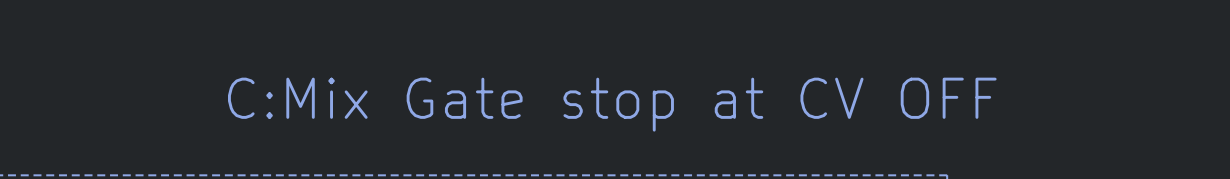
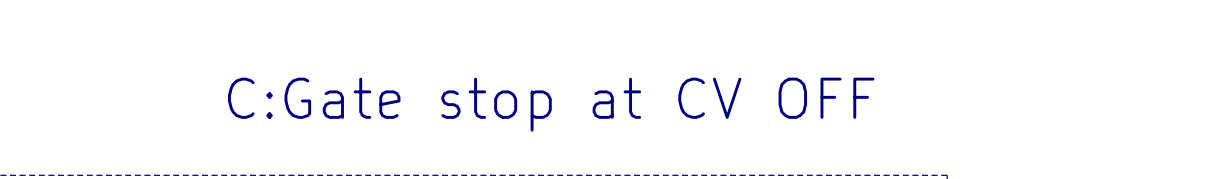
text: C:Mix Gate stop at CV OFF (612, 104) -> C:Gate stop at CV OFF (551, 104)

